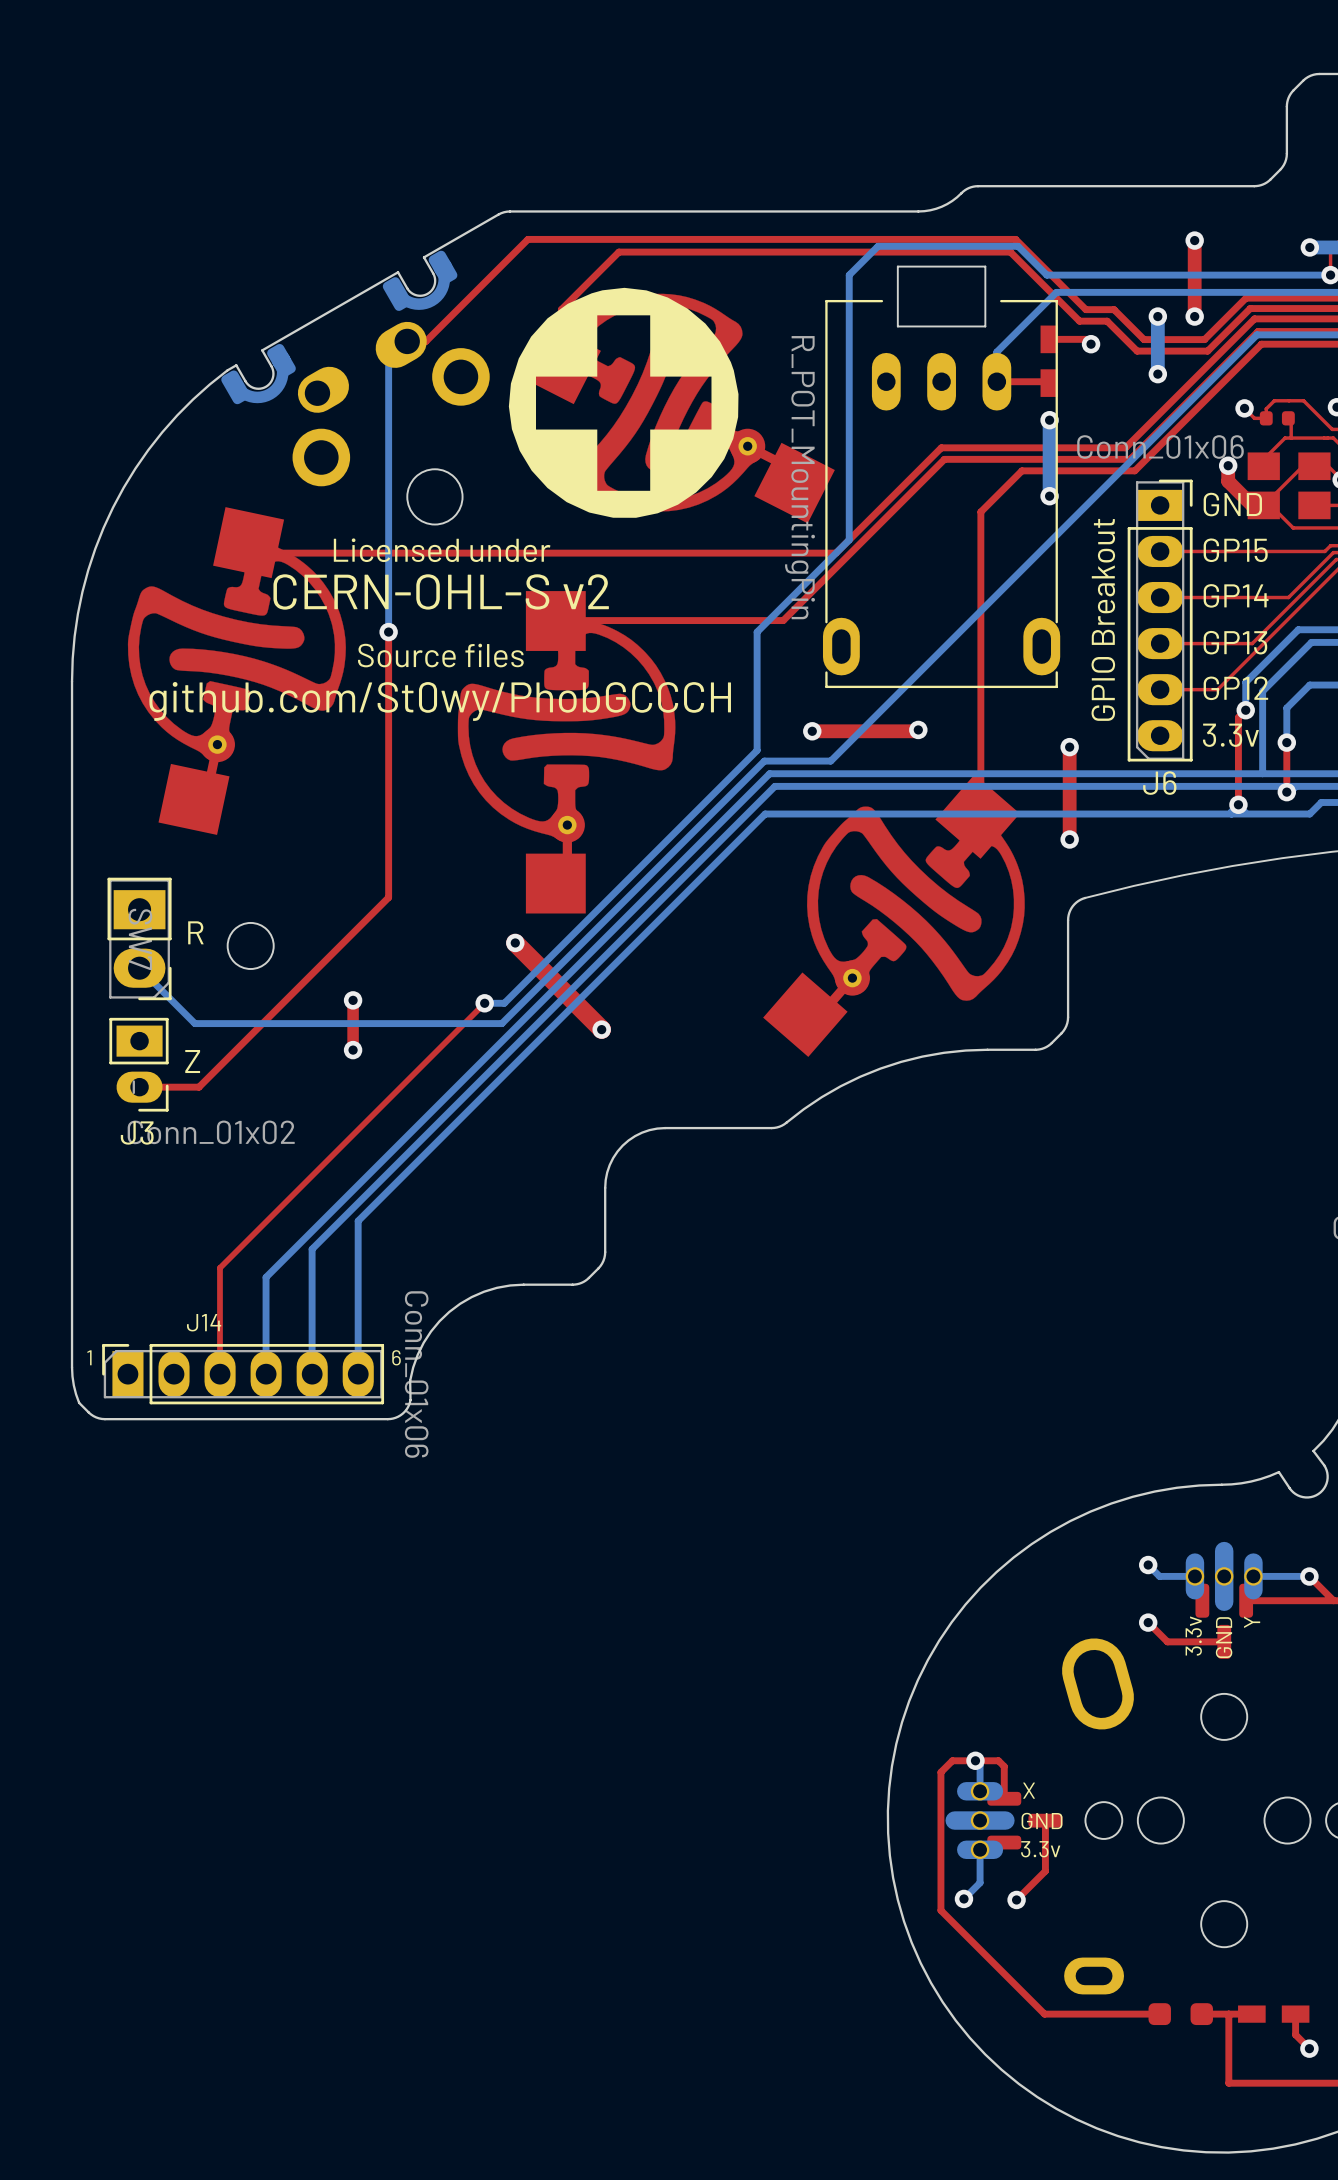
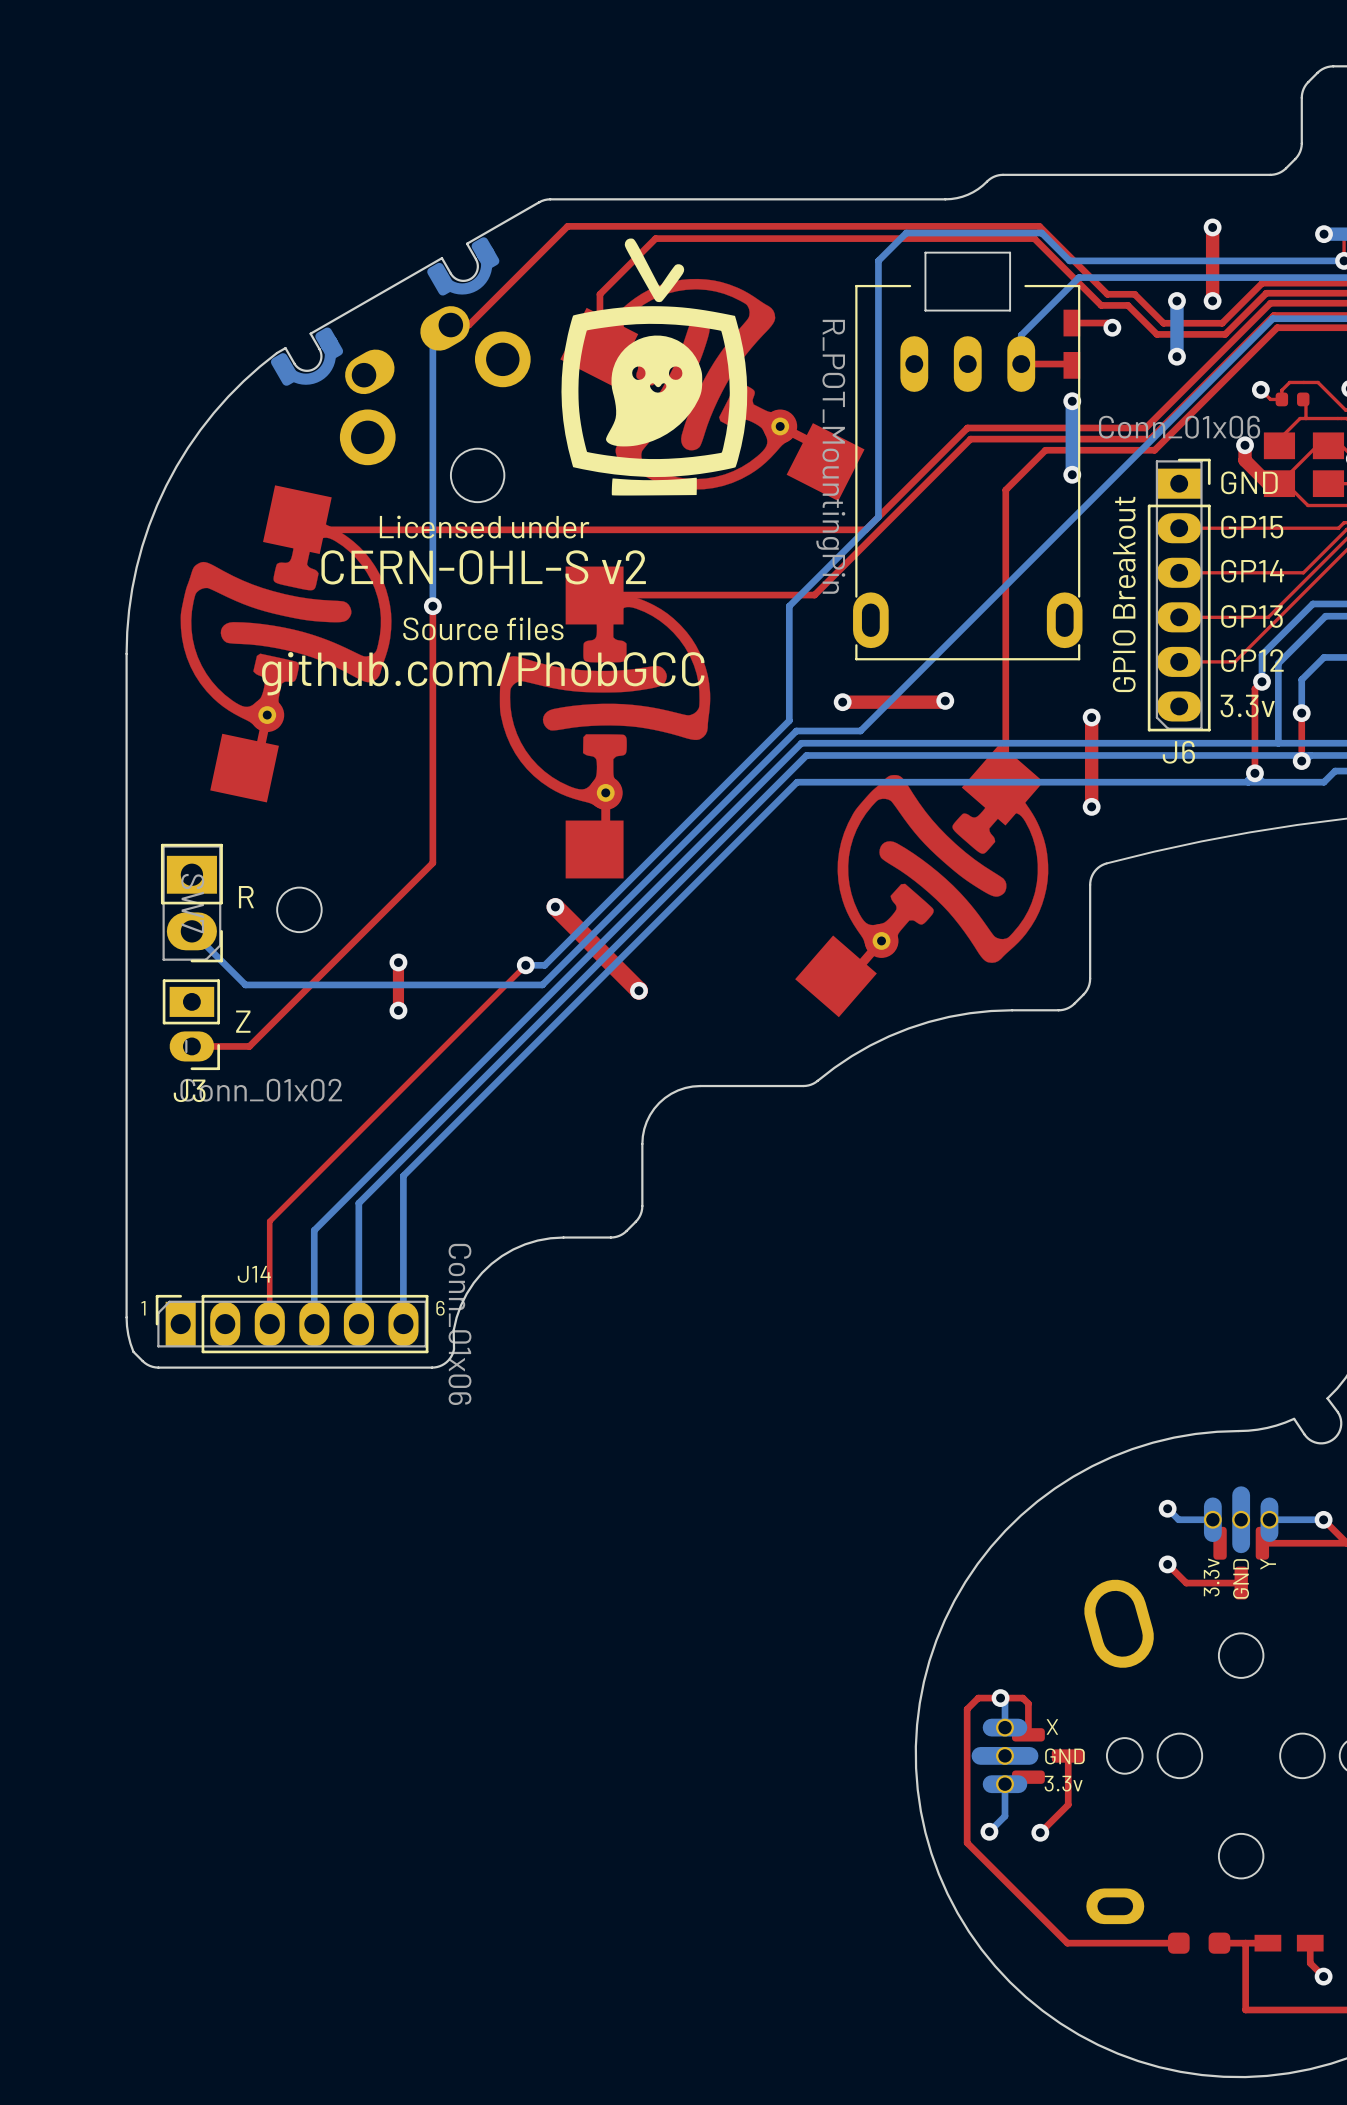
drawing shape: [508, 287, 739, 518] -> [561, 238, 748, 496]
text: github.com/St0wy/PhobGCCCH (440, 701) -> github.com/PhobGCC (483, 673)

